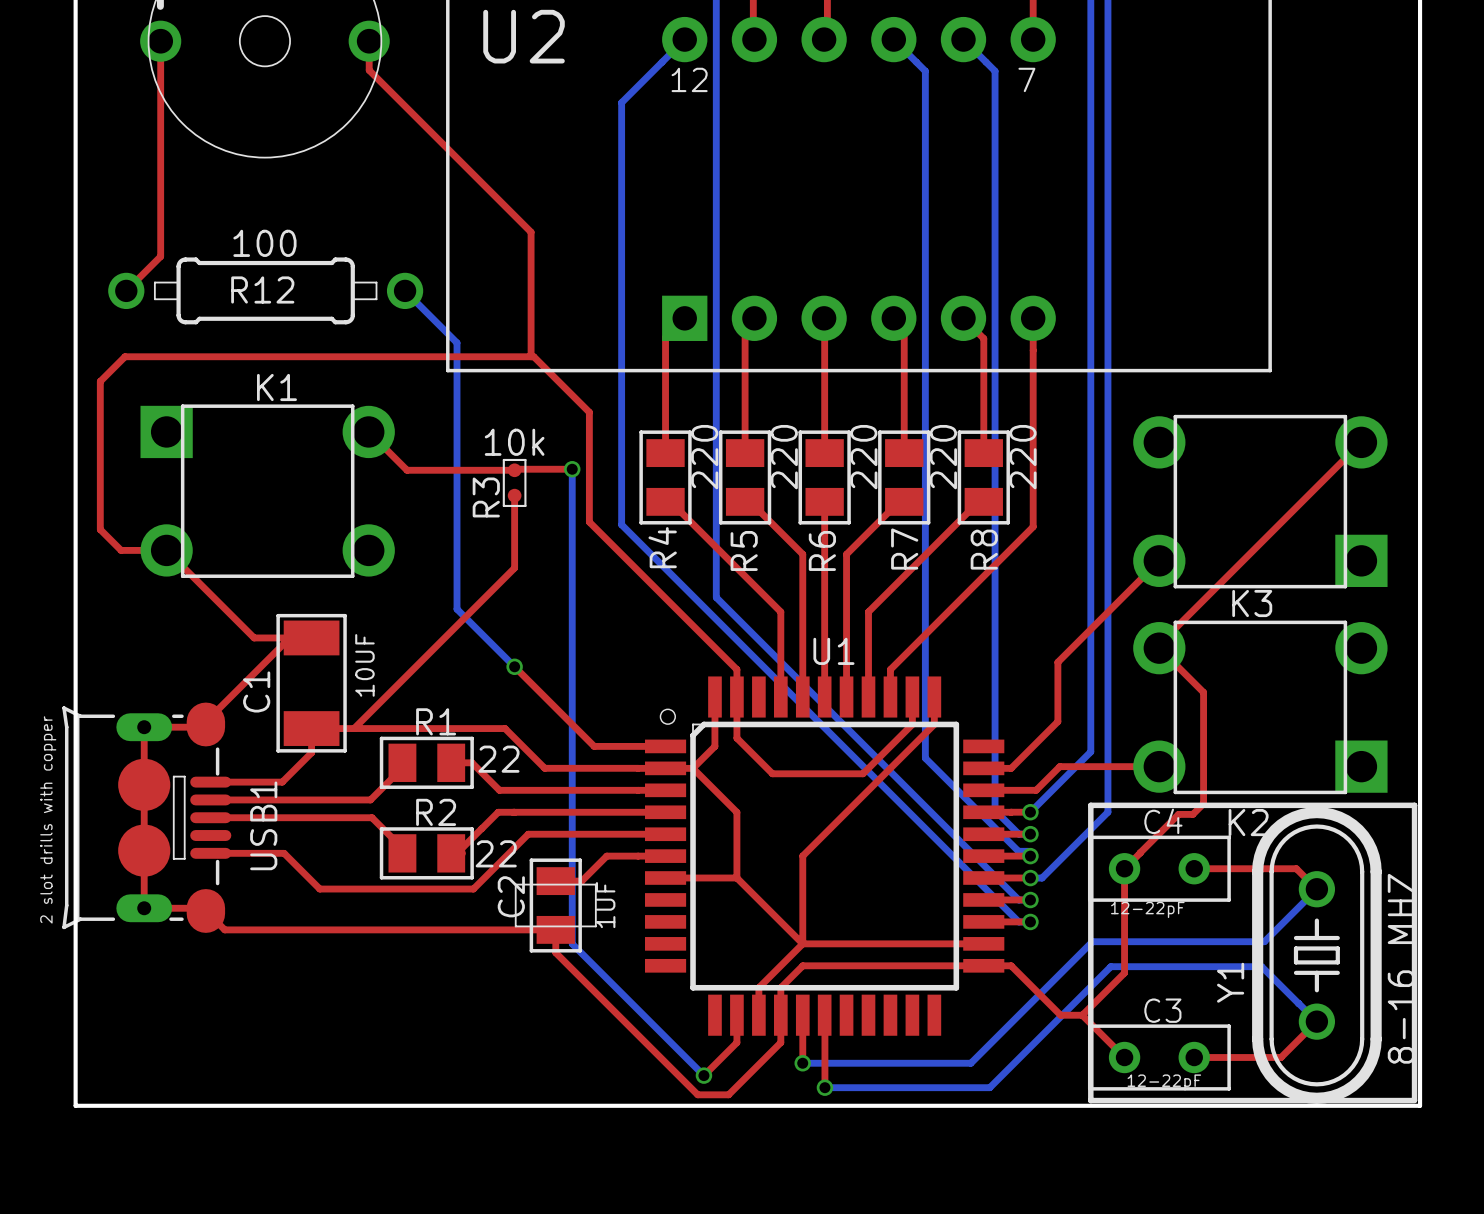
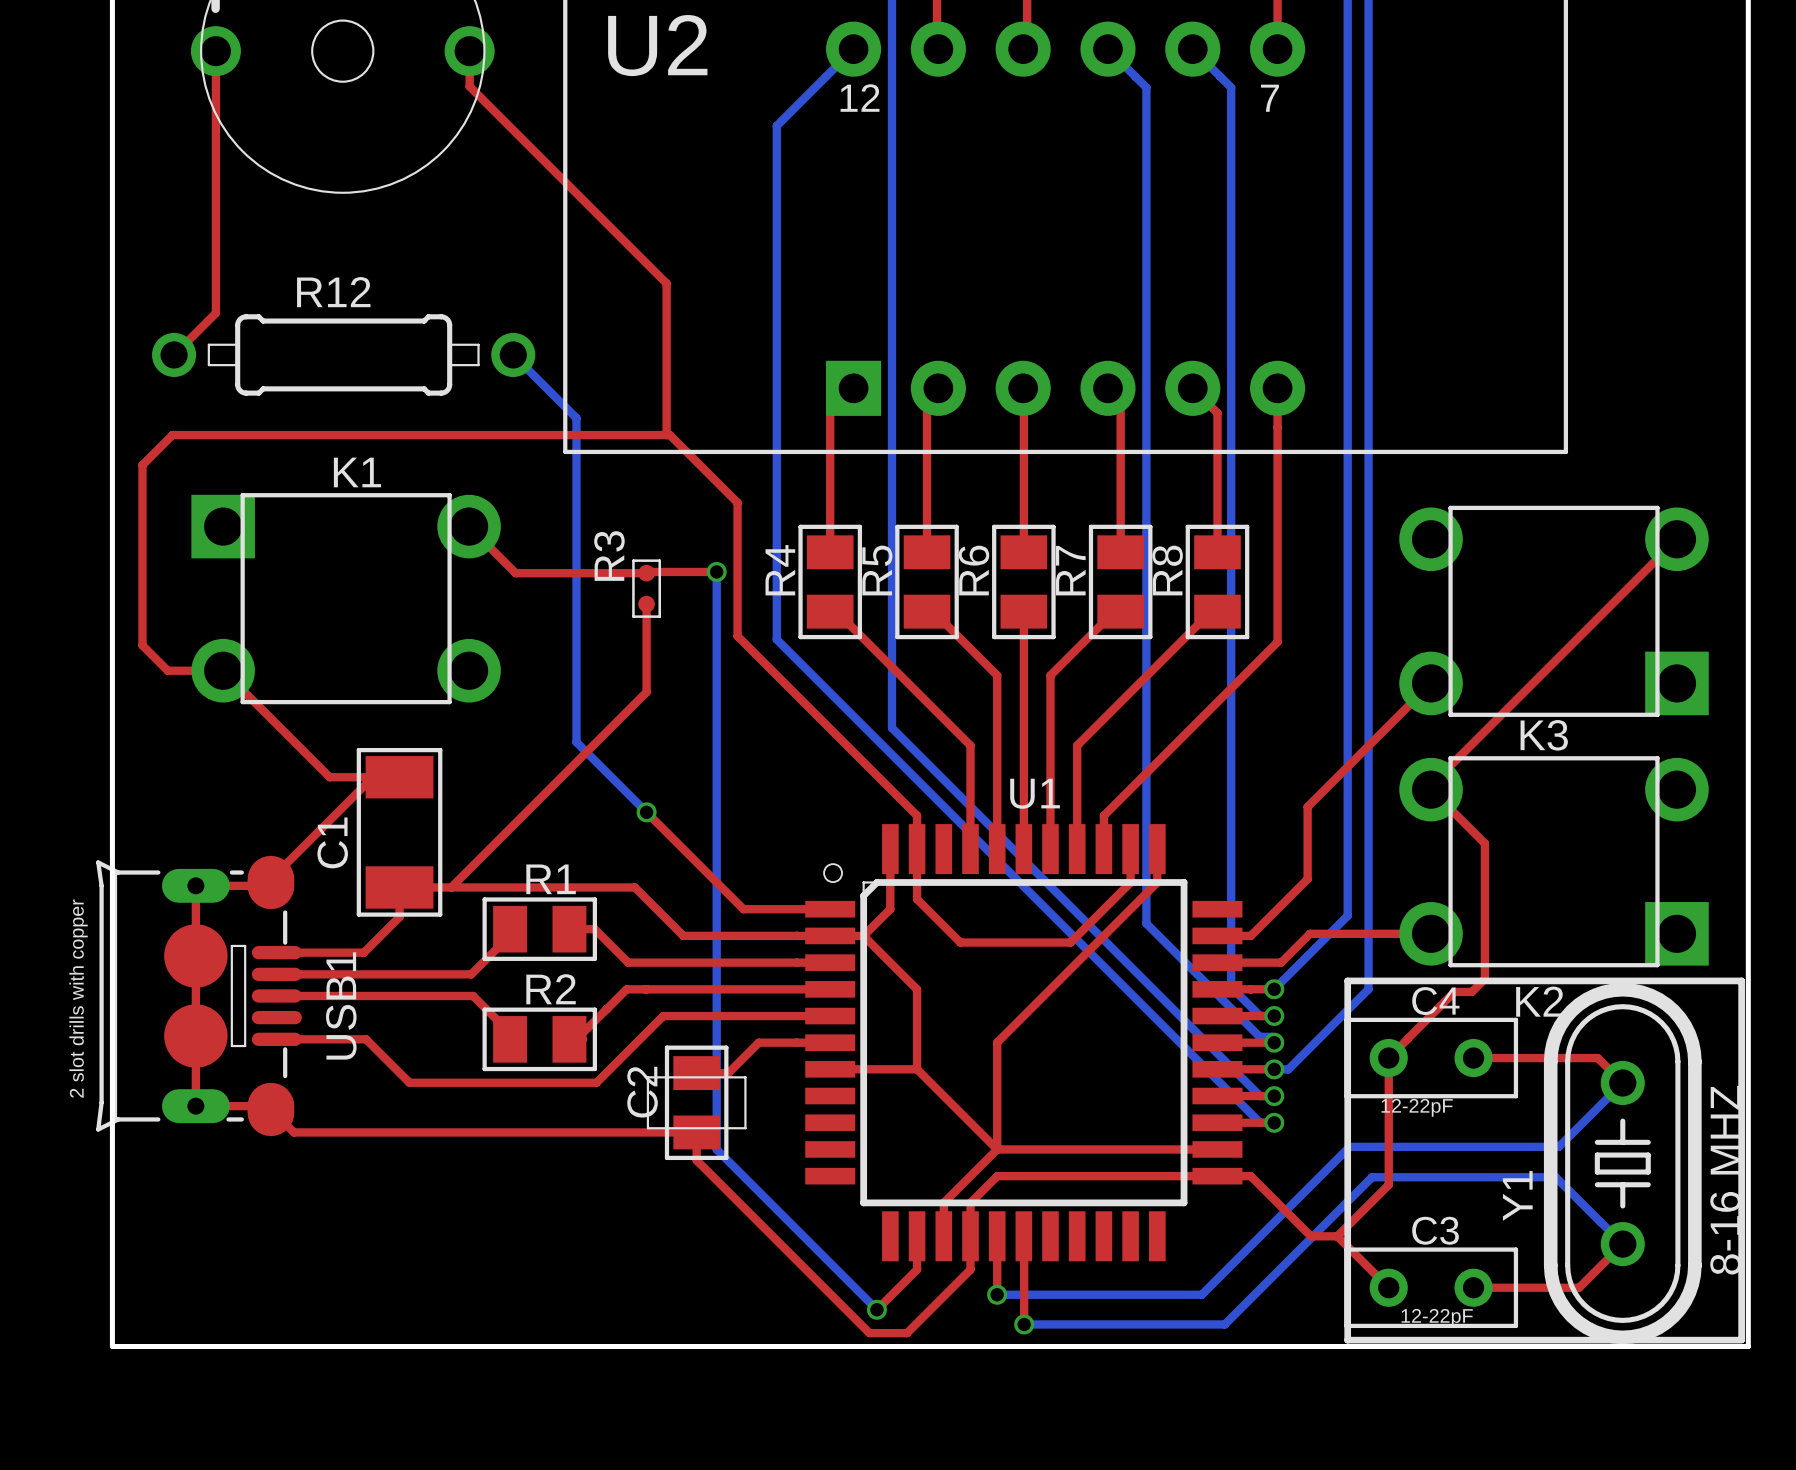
R12 value: 100 (264, 243) -> none
R12 name position: R12 (262, 289) -> R12 (333, 292)
R3 value: 10k (514, 442) -> none
R4 value: 220 (704, 457) -> none
R5 value: 220 (784, 457) -> none
R6 value: 220 (863, 457) -> none
R7 value: 220 (943, 457) -> none
R8 value: 220 (1022, 457) -> none
R3 name position: R3 (486, 497) -> R3 (609, 556)
R4 name position: R4 (662, 547) -> R4 (780, 570)
R7 name position: R7 (904, 549) -> R7 (1070, 570)
R8 name position: R8 (984, 549) -> R8 (1167, 570)
R5 name position: R5 (744, 550) -> R5 (877, 570)
R6 name position: R6 (822, 550) -> R6 (973, 570)
C1 value: 10UF (364, 665) -> none
R1 value: 22 (498, 759) -> none
R2 value: 22 (496, 853) -> none
C2 value: 1UF (605, 905) -> none

